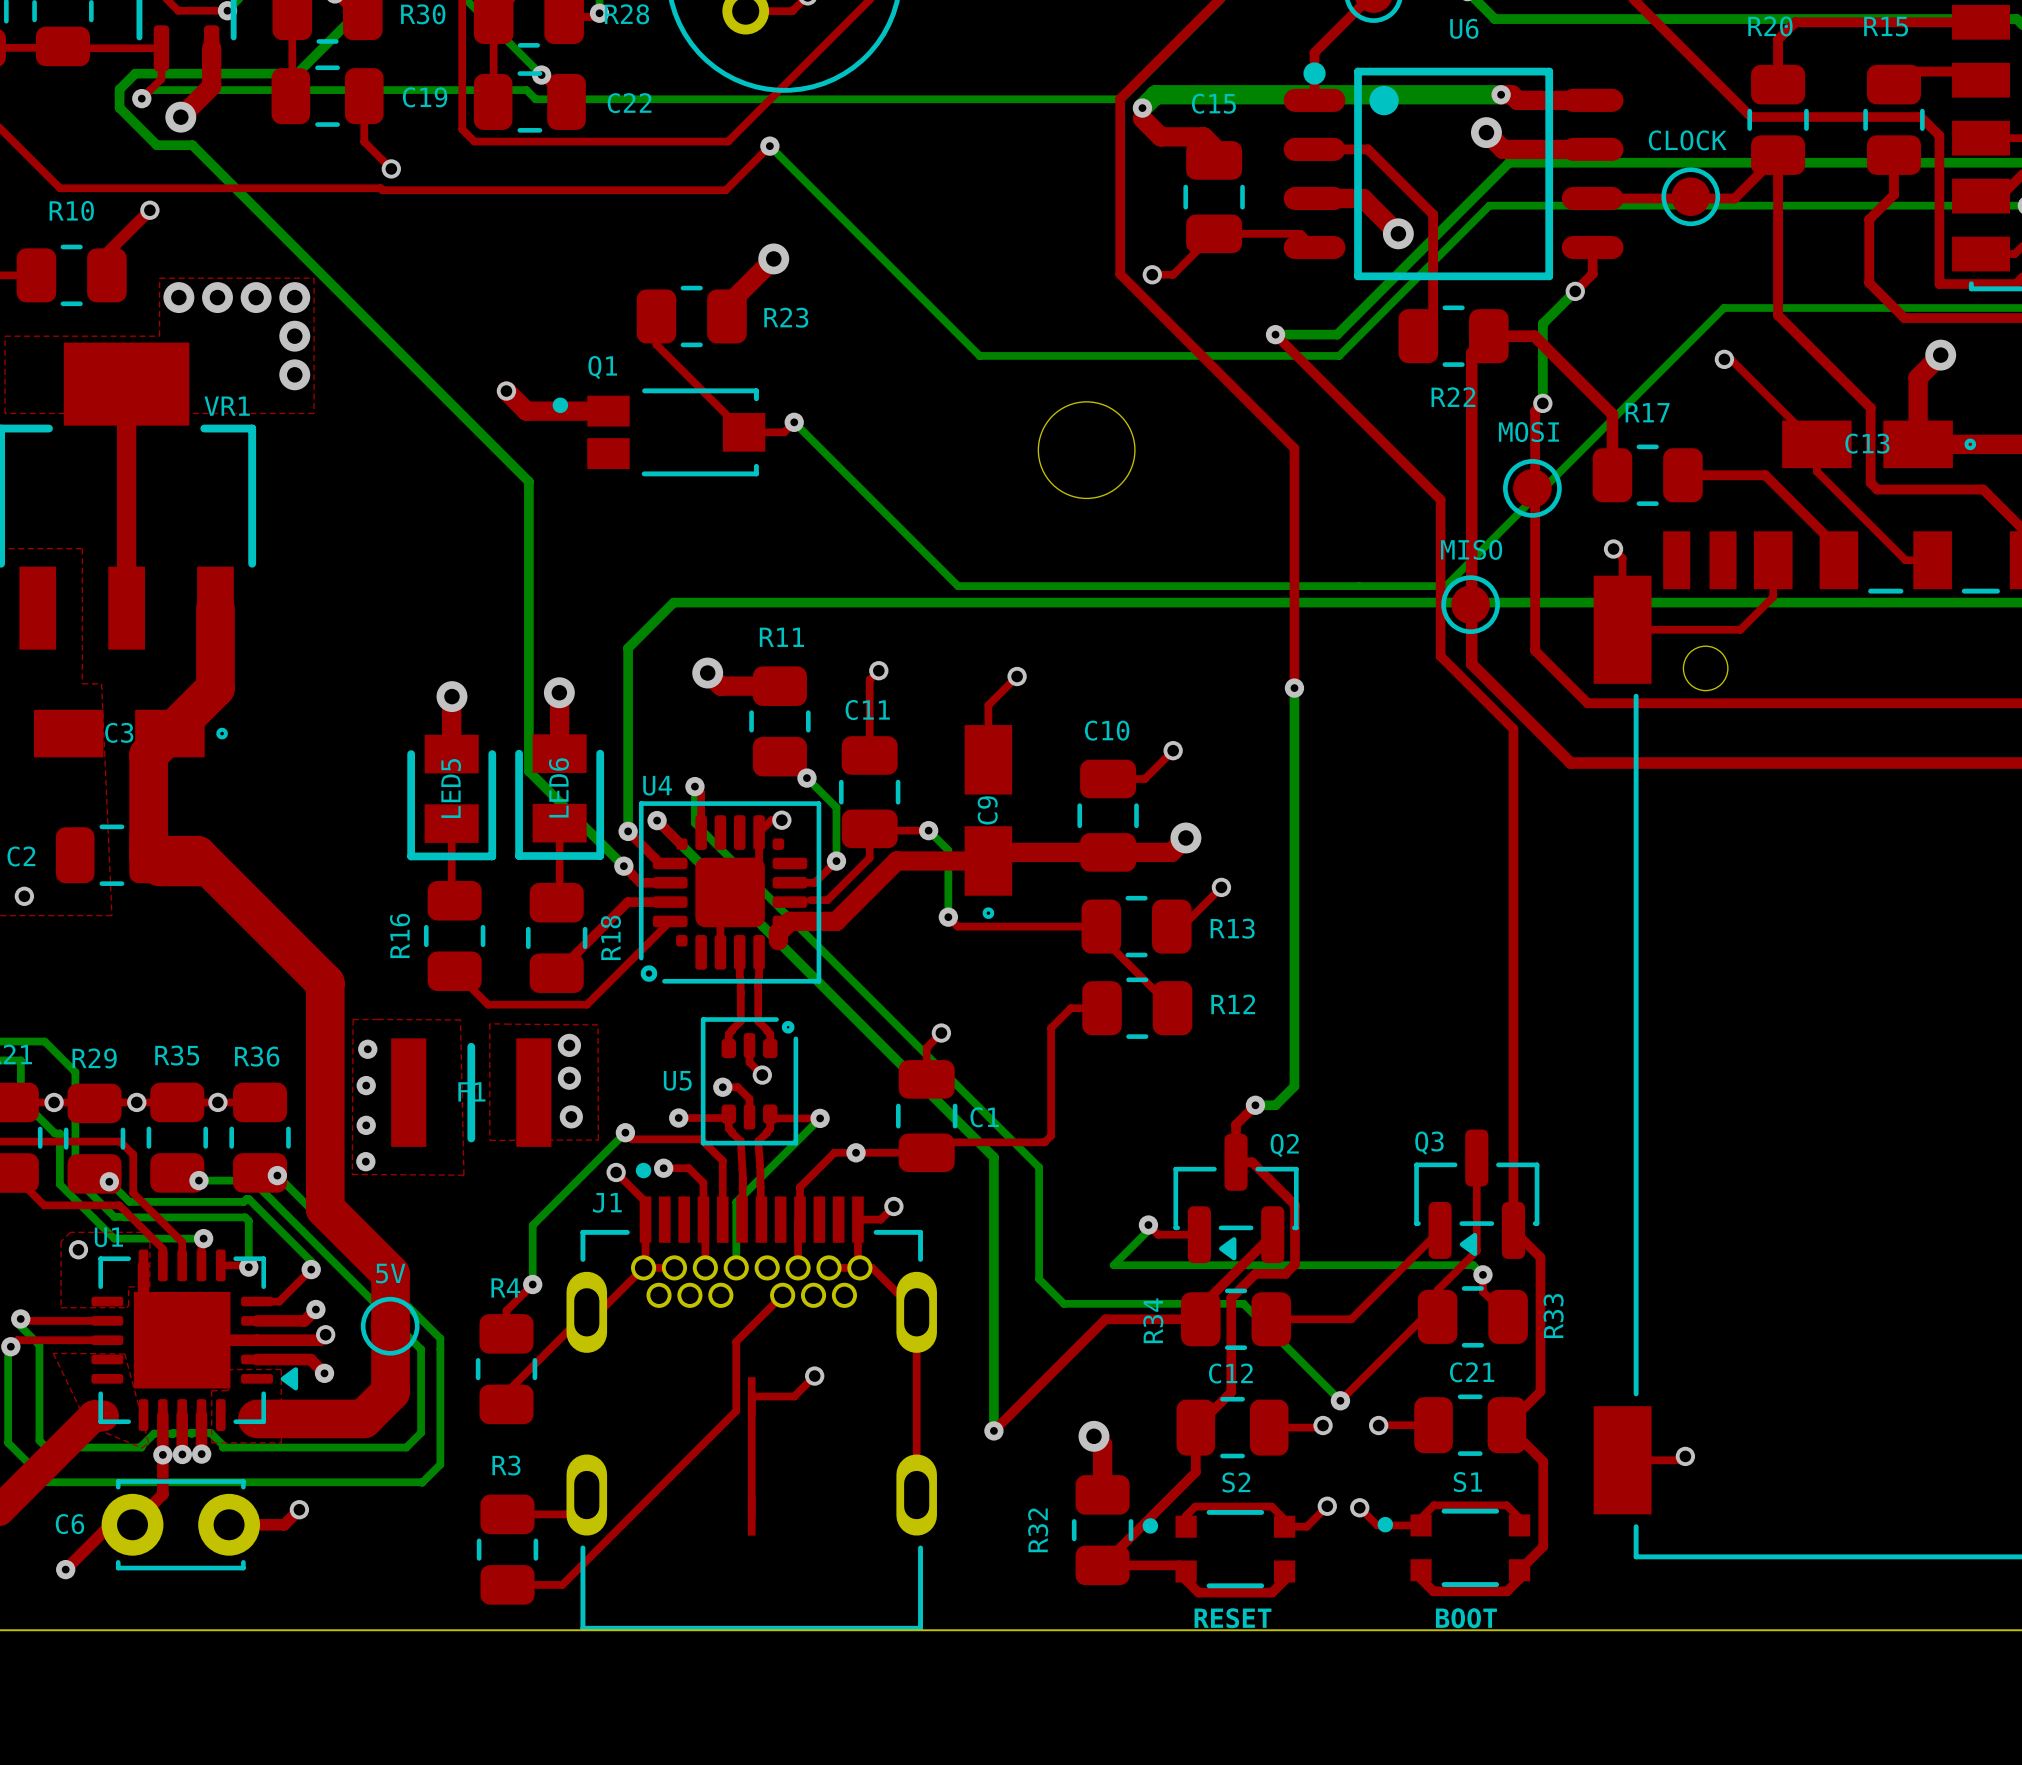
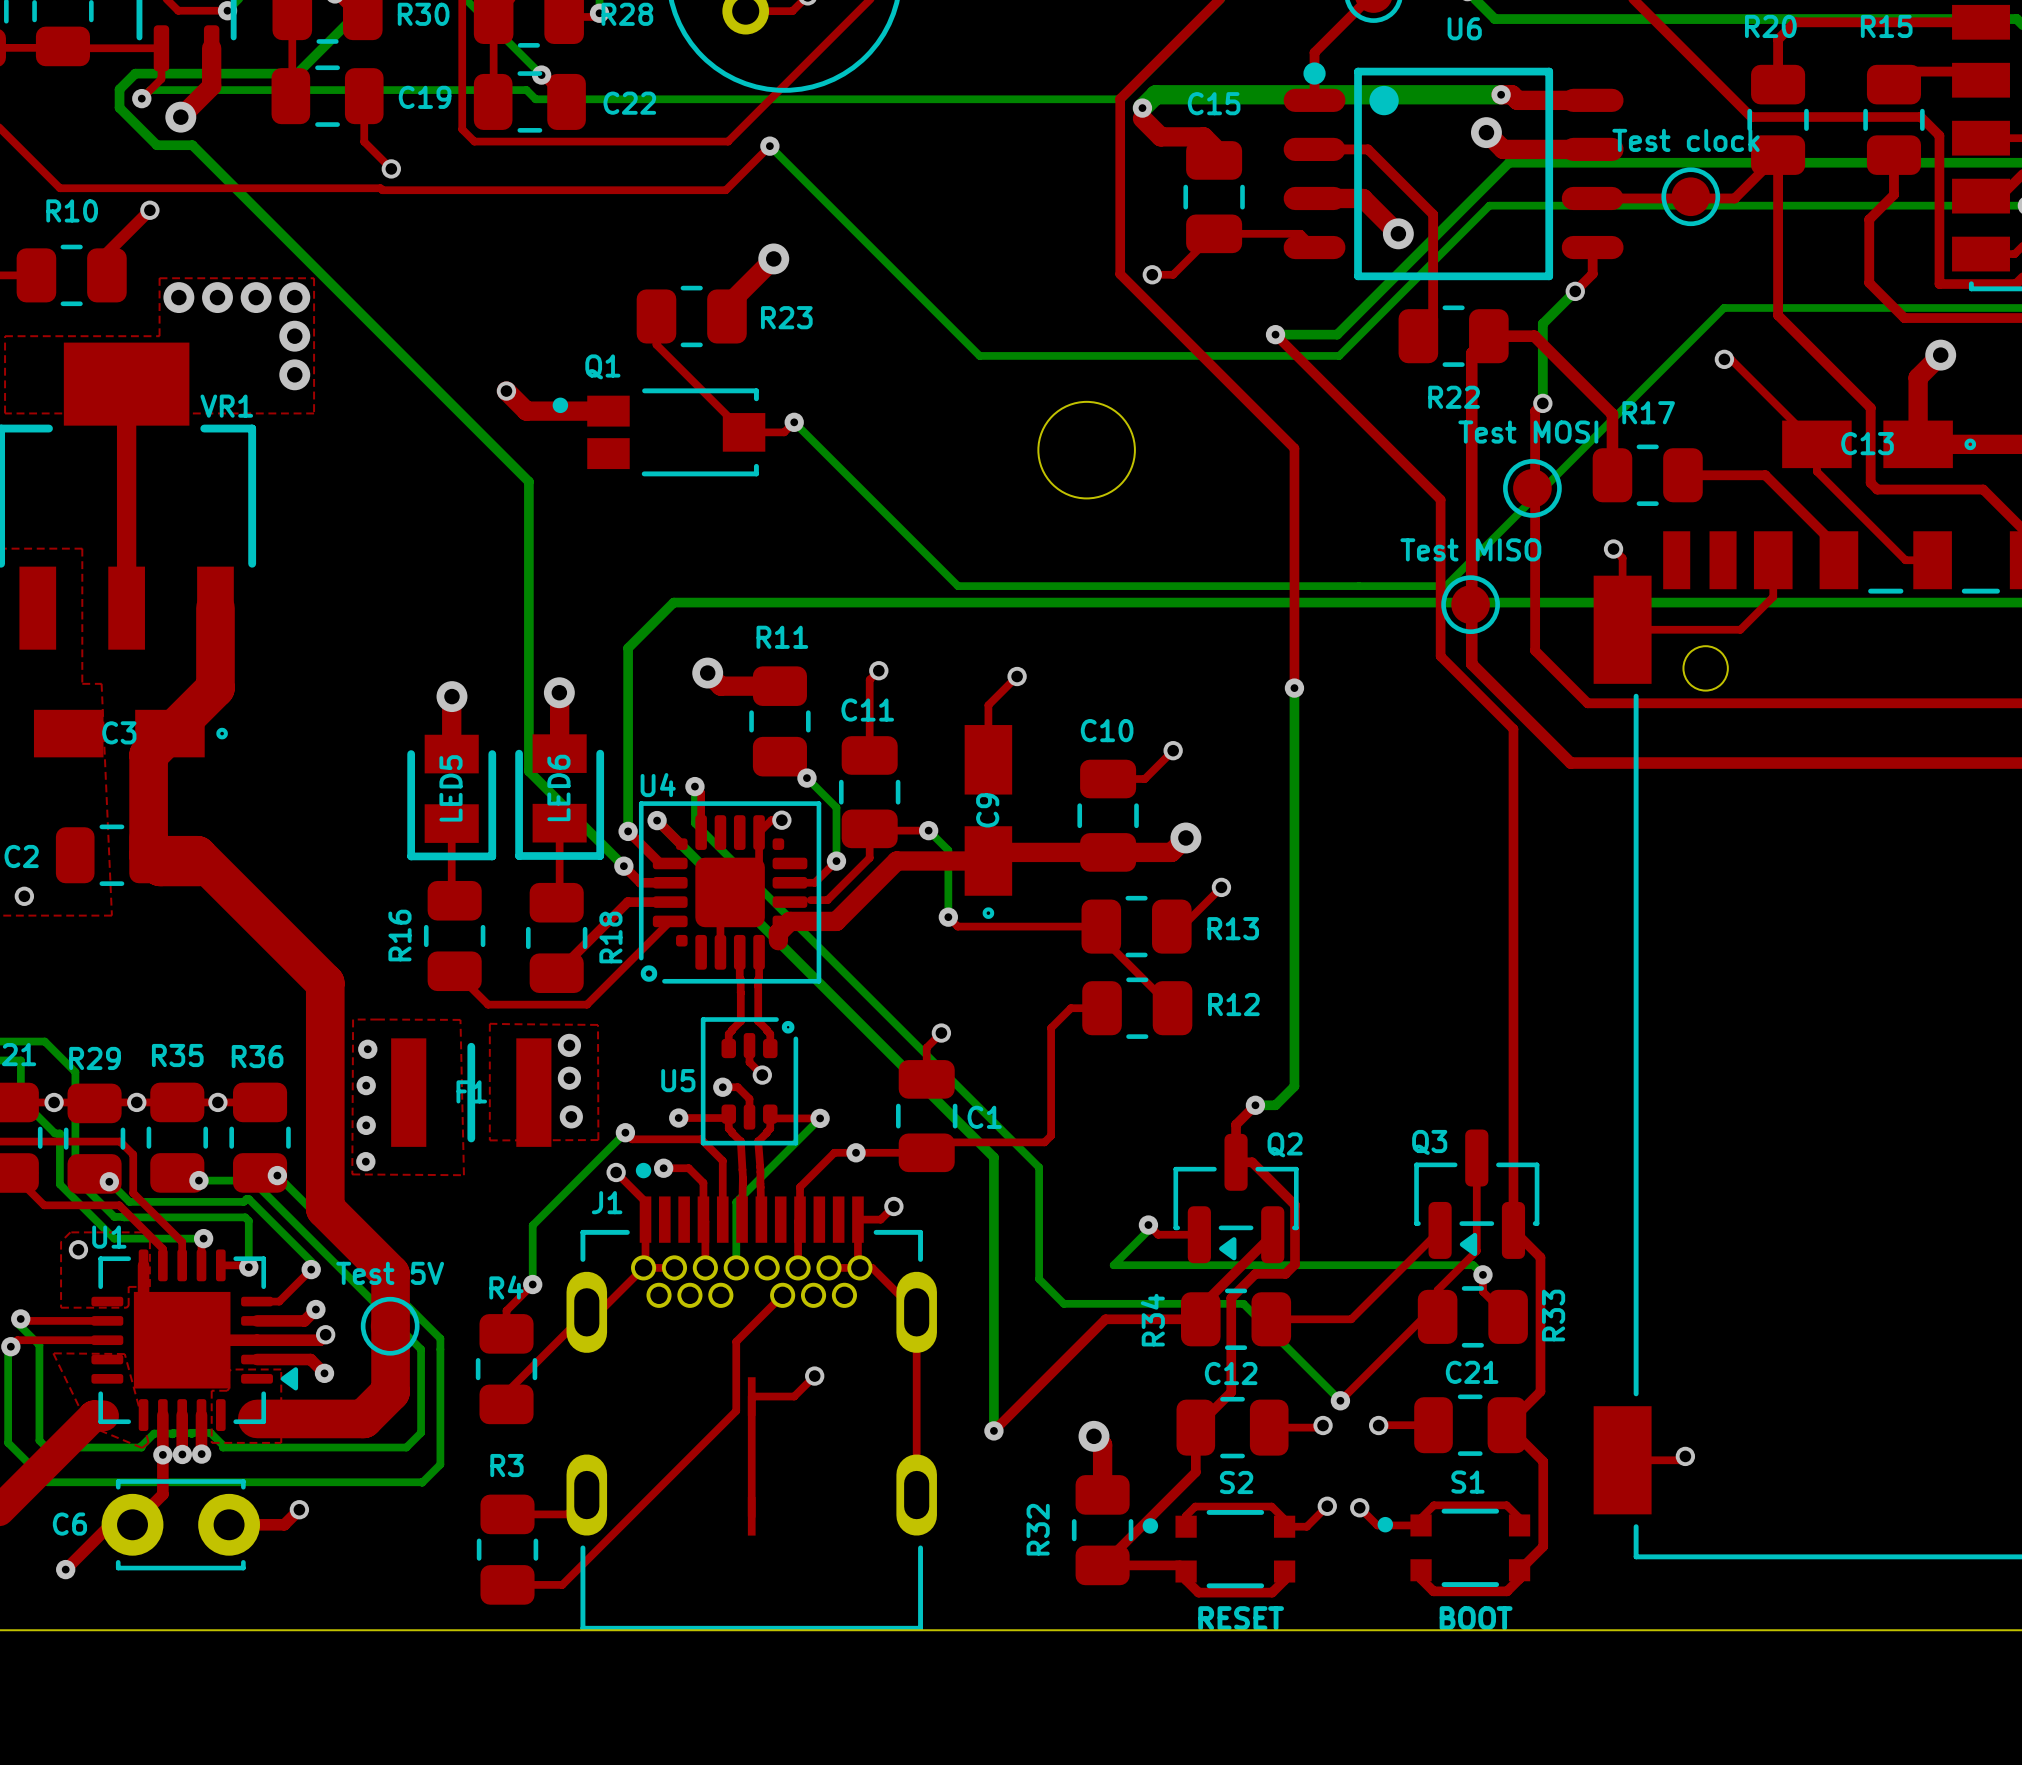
part value: CLOCK (1687, 140) -> Test clock (1686, 140)
part value: MOSI (1528, 432) -> Test MOSI (1528, 432)
part value: MISO (1471, 549) -> Test MISO (1470, 549)
part value: 5V (390, 1273) -> Test 5V (390, 1273)

